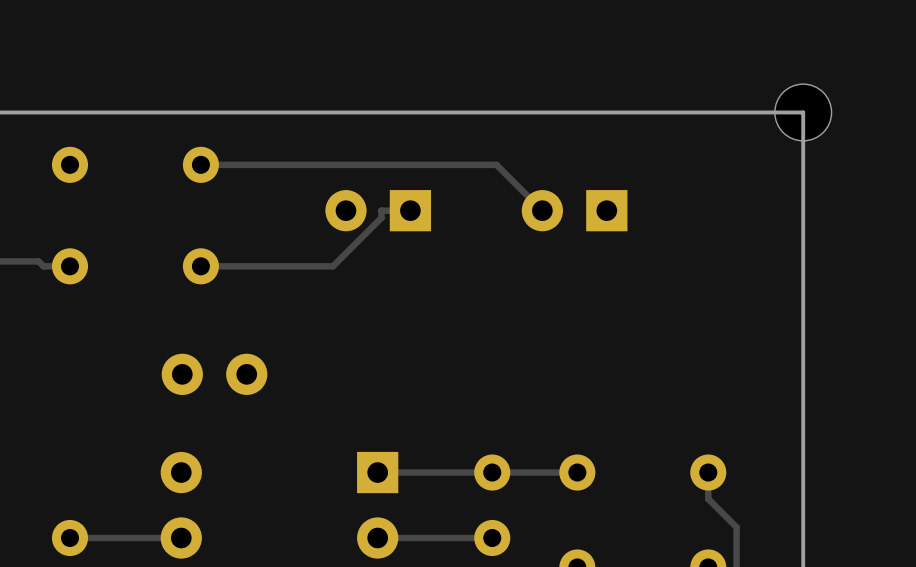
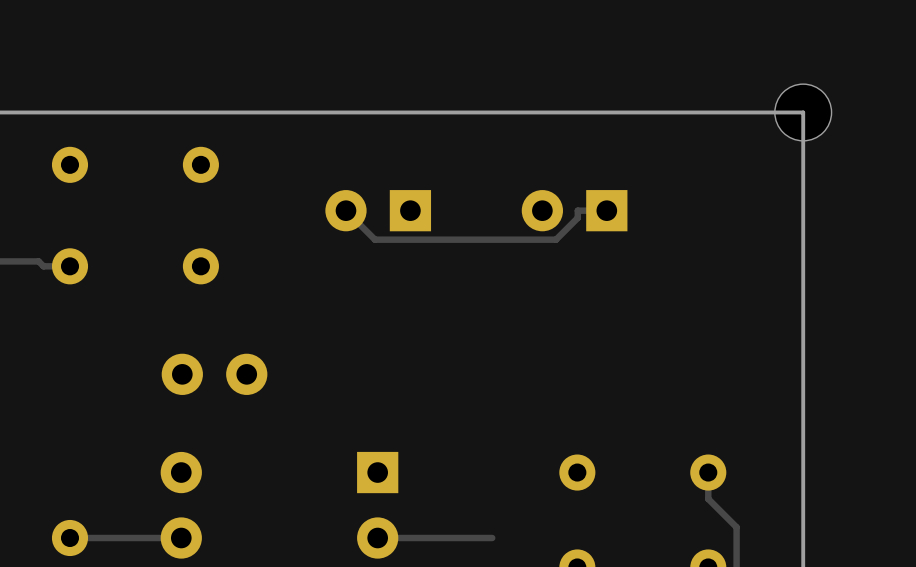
track: (200, 164) (496, 164) (542, 210) -> none
track: (410, 210) (381, 210) (381, 217) (333, 266) (200, 266) -> none
track: none -> (606, 210) (577, 210) (577, 217) (556, 239) (374, 239) (345, 210)
track: (577, 472) (377, 472) -> none
part: (492, 505) -> none

